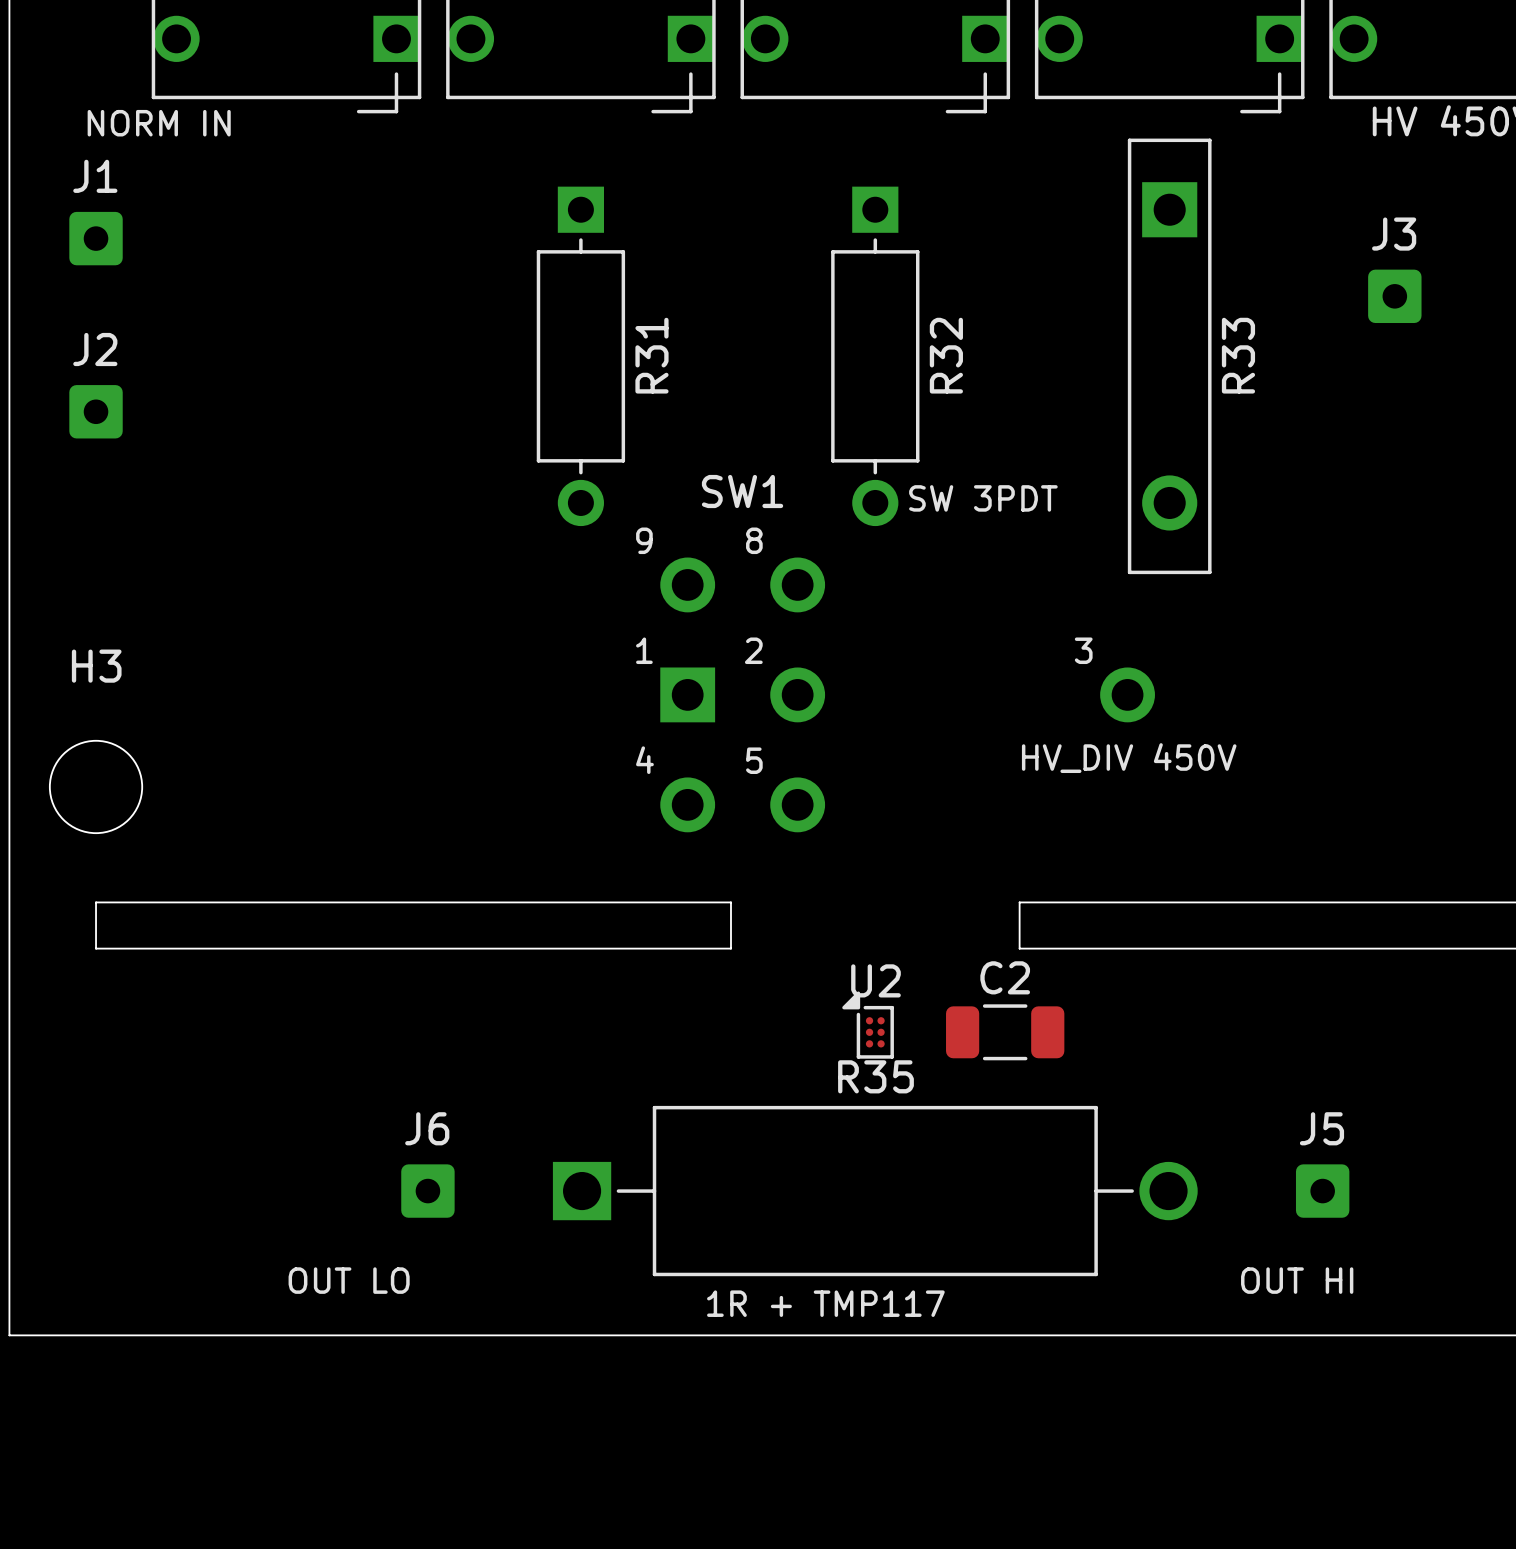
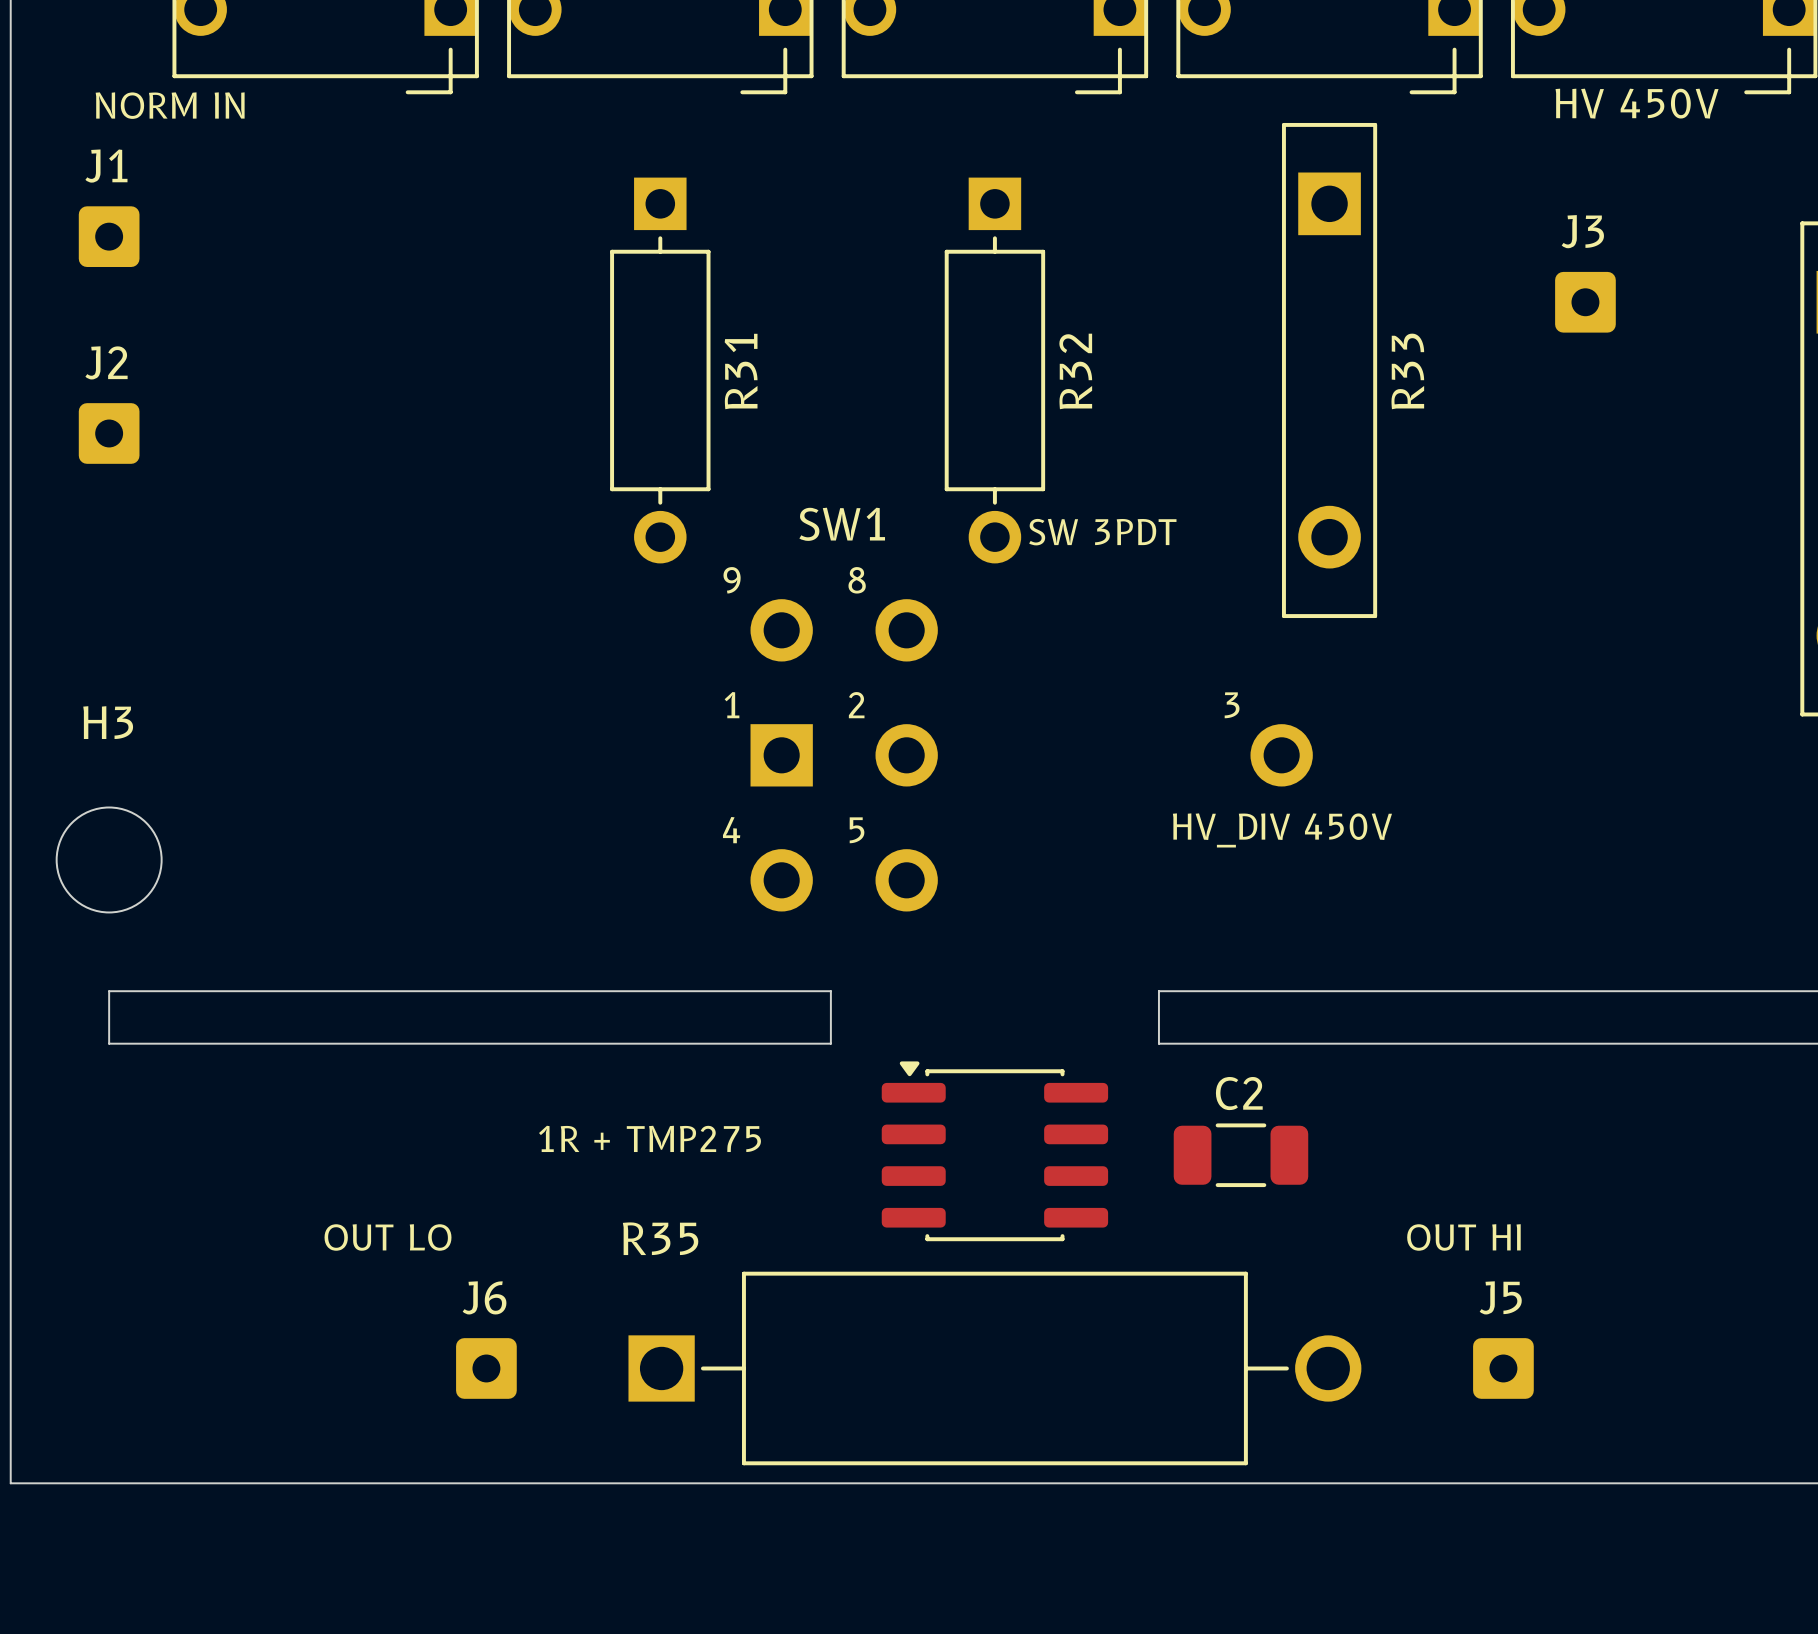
U2: (868, 1025) -> none
text: none -> 1R + TMP275 (649, 1138)
C2 position: (1005, 1032) -> (1240, 1155)
part: none -> (994, 1151)
R35 name position: R35 (875, 1076) -> R35 (660, 1238)
J6 position: (427, 1191) -> (486, 1368)
R35 position: (875, 1191) -> (994, 1368)
J5 position: (1322, 1191) -> (1503, 1368)
text position: OUT LO (349, 1280) -> OUT LO (388, 1237)
text position: OUT HI (1297, 1280) -> OUT HI (1463, 1237)
text: 1R + TMP117 (825, 1303) -> none

